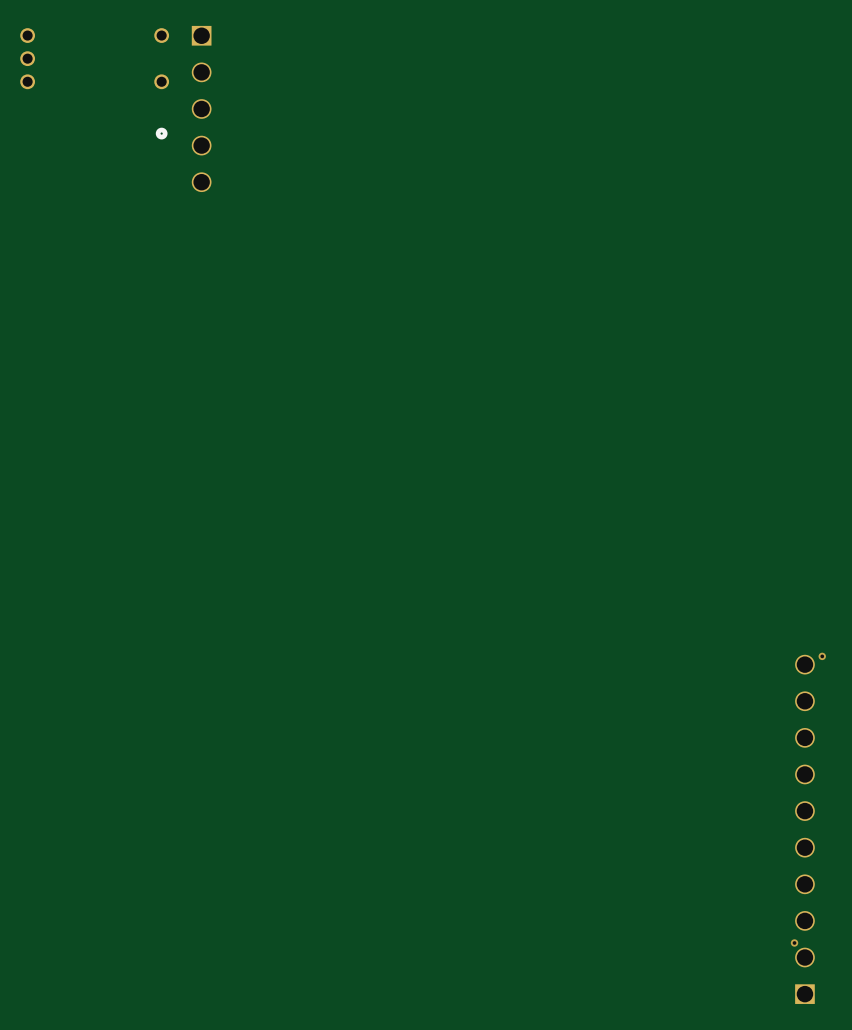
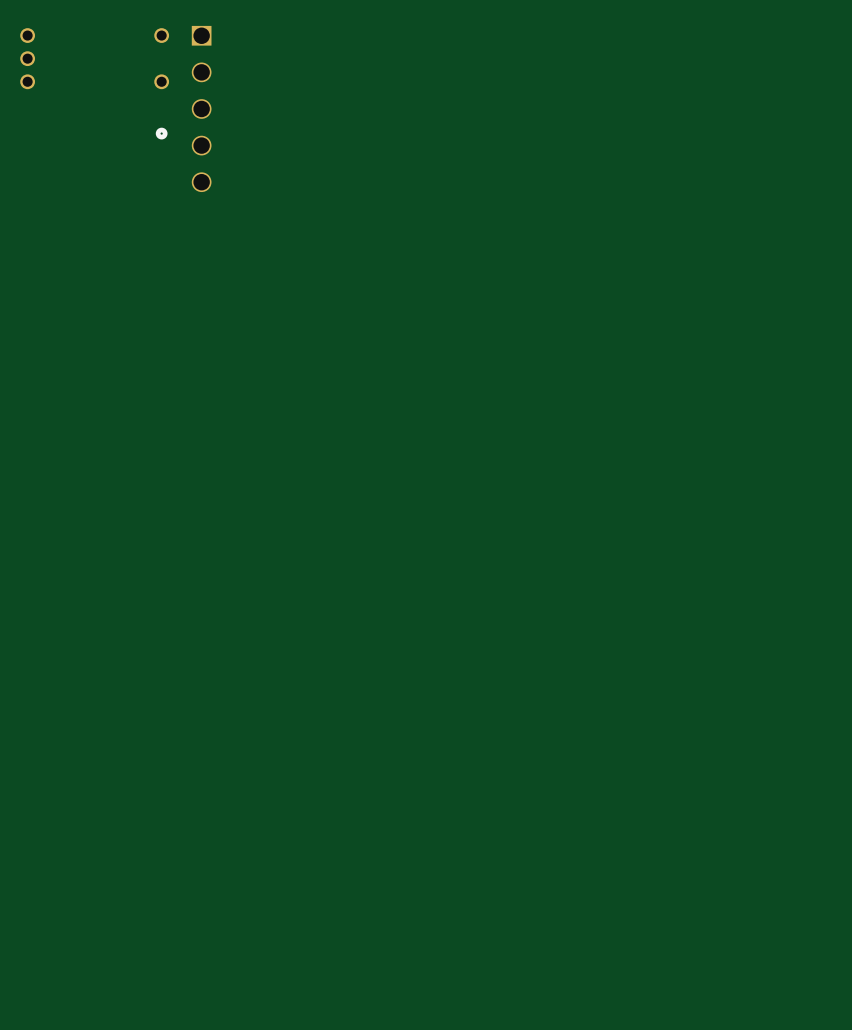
via: (822, 656) -> none
part: (804, 829) -> none
via: (794, 942) -> none

